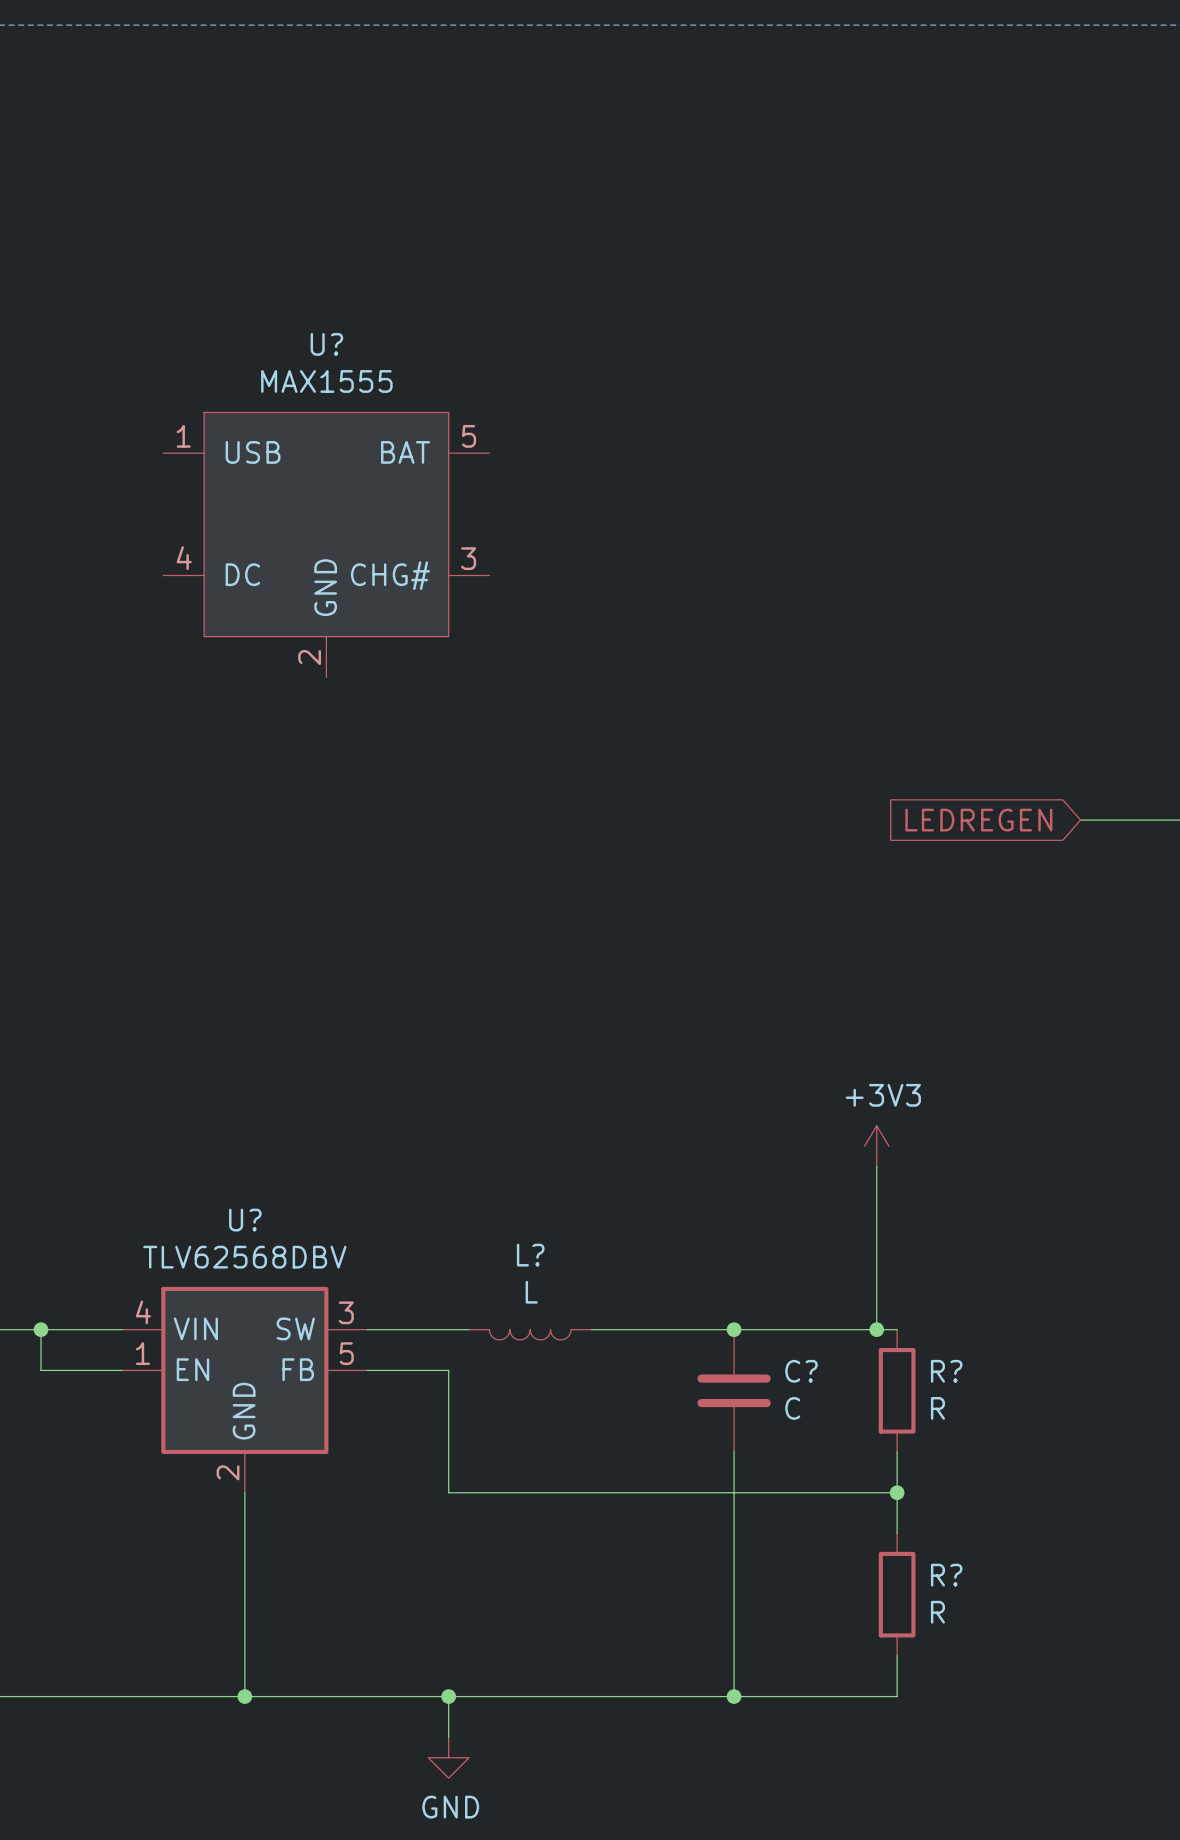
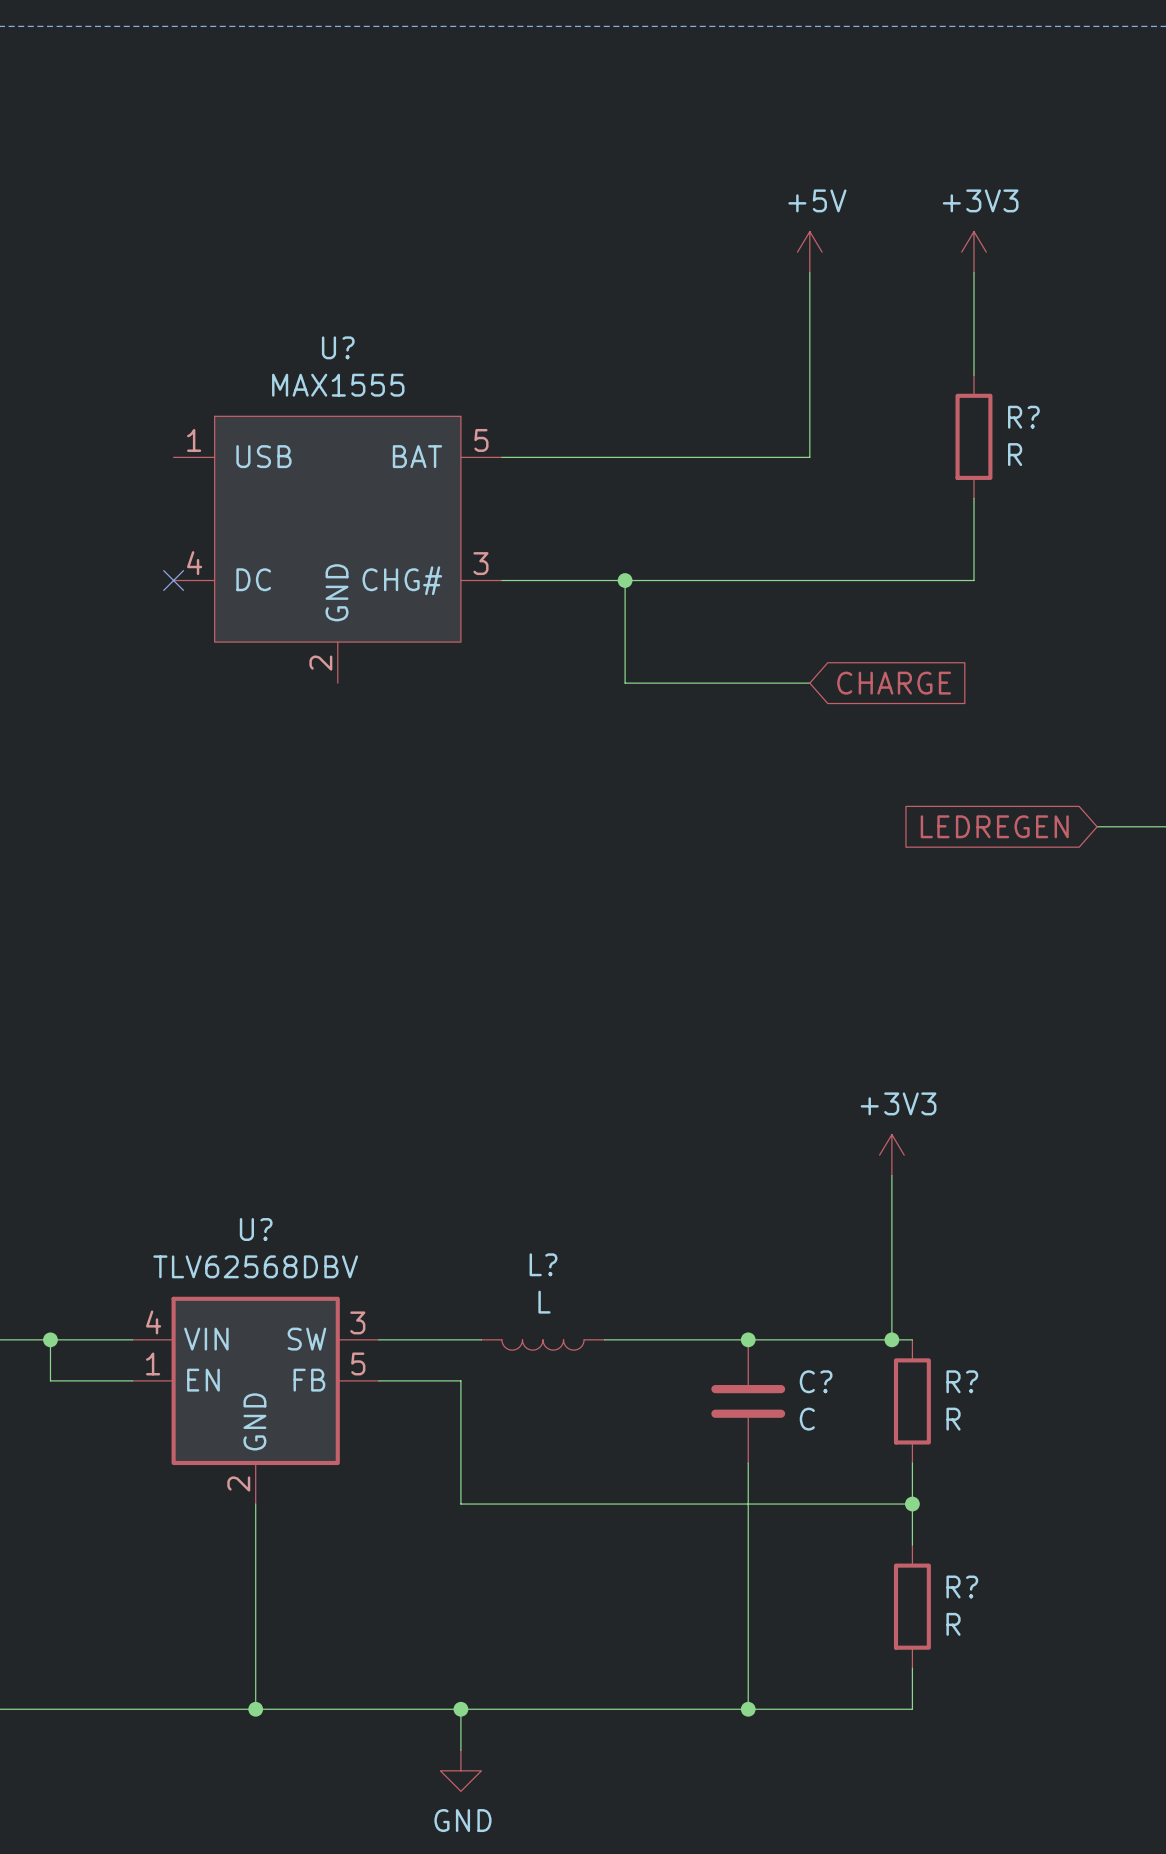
power symbol: none -> +5V (809, 252)
power symbol: none -> +3V3 (973, 252)
wire: none -> (809, 272) (809, 457) (501, 457)
wire: none -> (973, 272) (973, 375)
R?: none -> R (973, 436)
wire: none -> (973, 498) (973, 580) (501, 580)
no-connect mark: none -> (173, 580)
wire: none -> (625, 580) (625, 683) (809, 683)
junction: none -> (625, 580)
global label: none -> CHARGE (894, 683)

